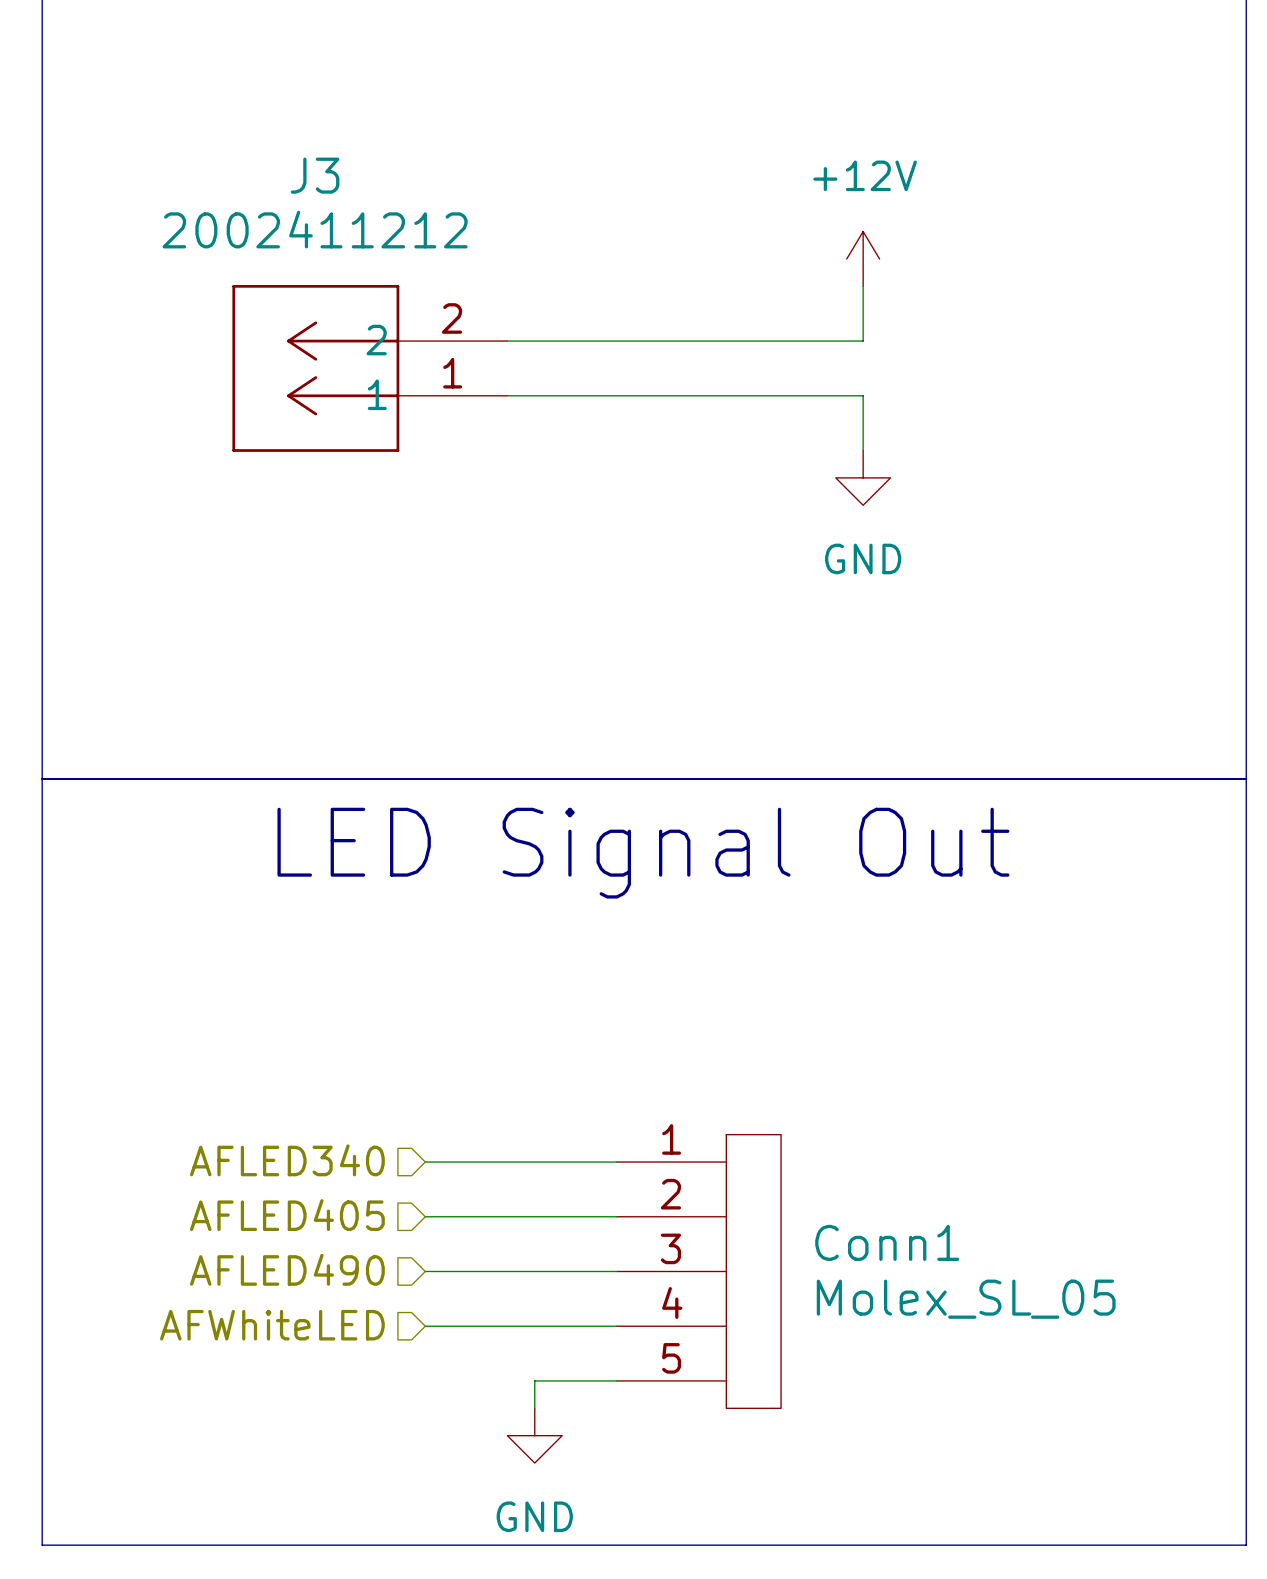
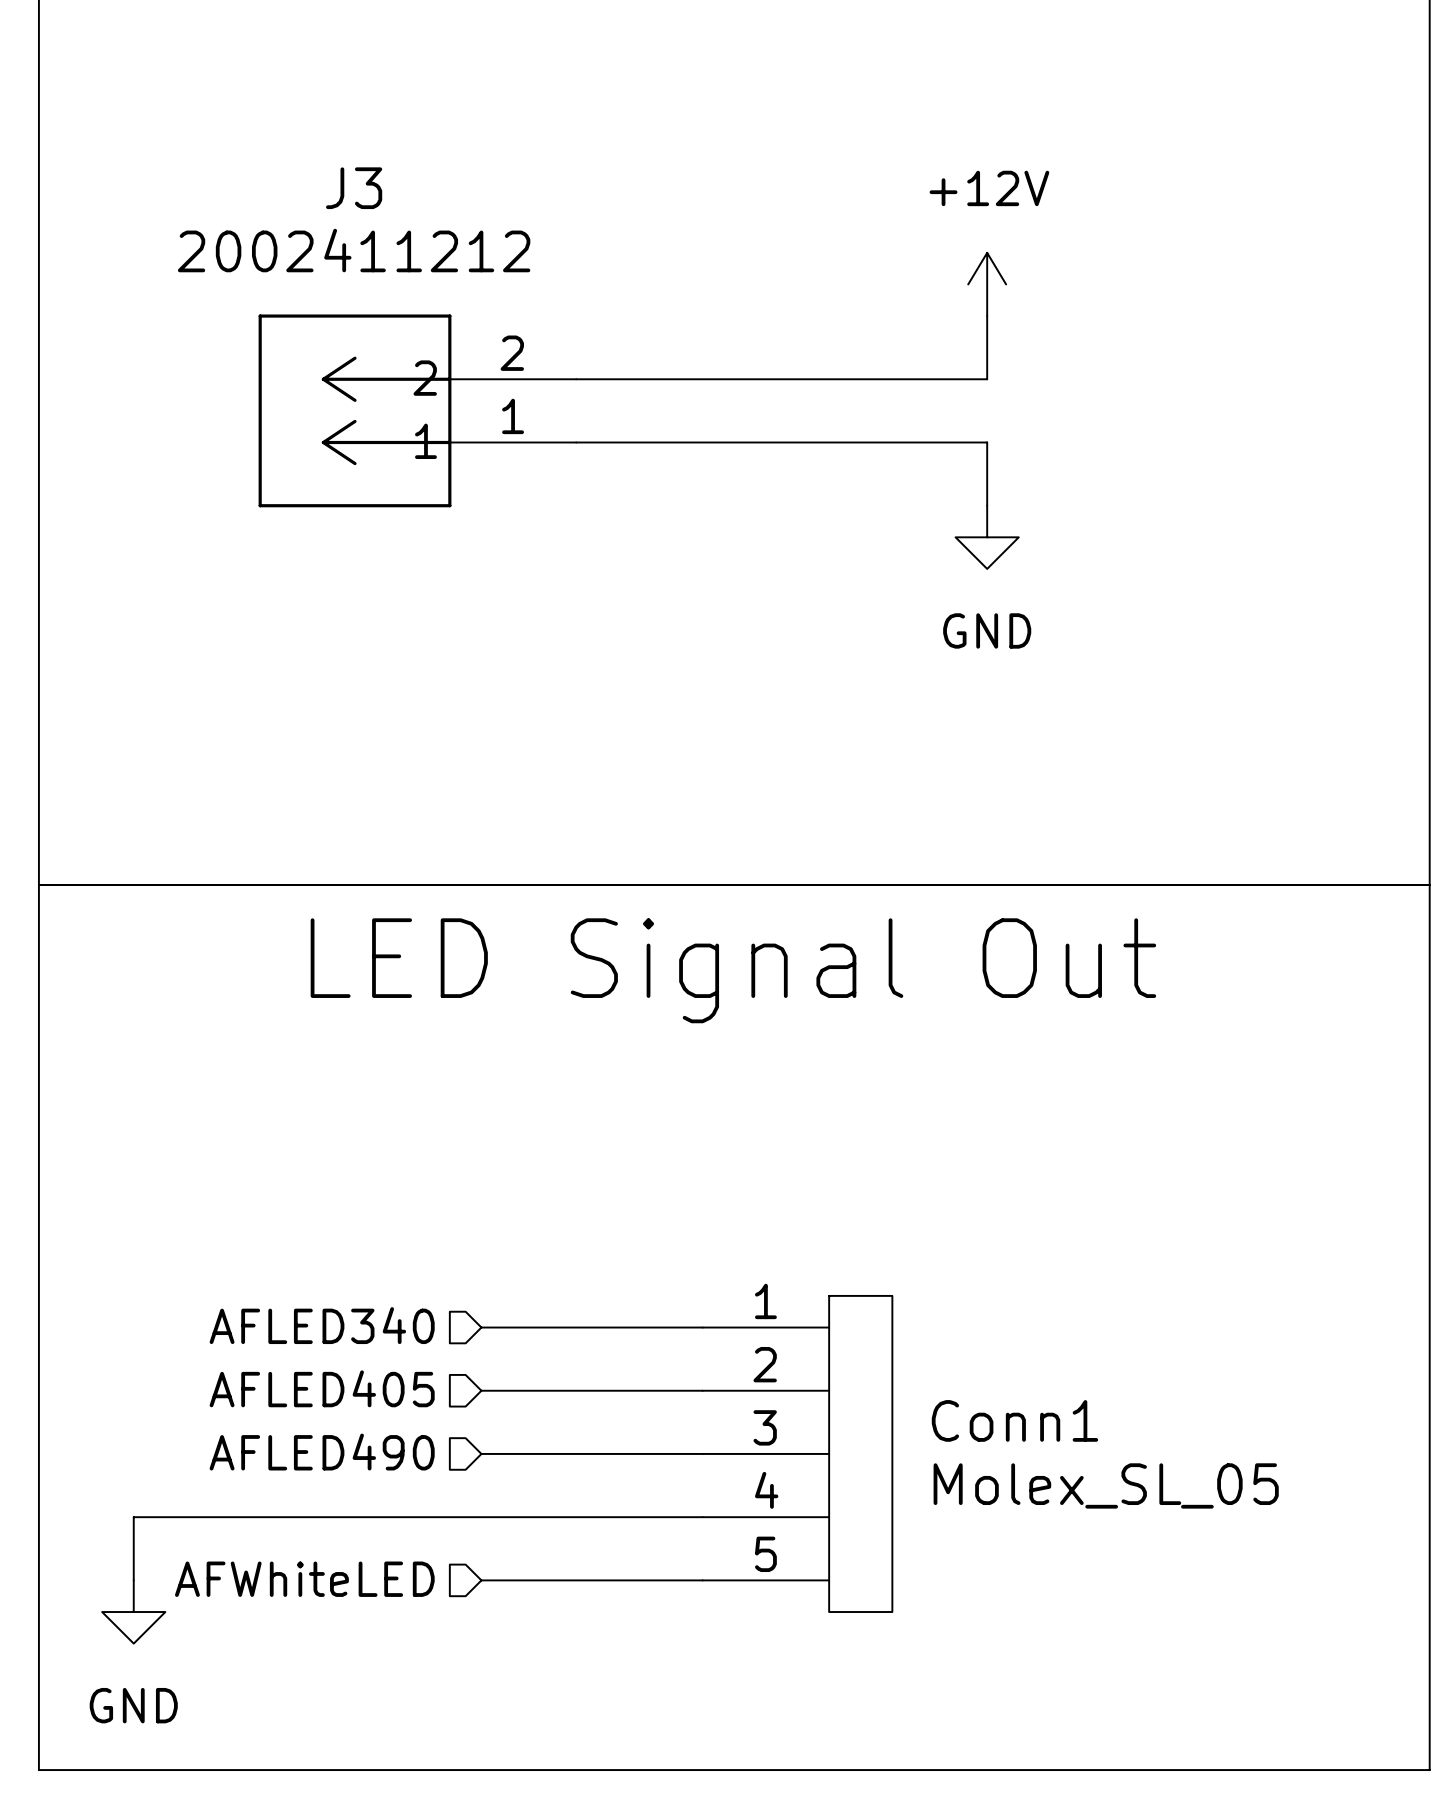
hierarchical label position: AFWhiteLED (272, 1325) -> AFWhiteLED (304, 1579)
wire: none -> (481, 1517) (133, 1517) (133, 1580)
wire: (534, 1380) (534, 1408) -> (607, 1580) (481, 1580)
power symbol position: GND (534, 1435) -> GND (133, 1612)

